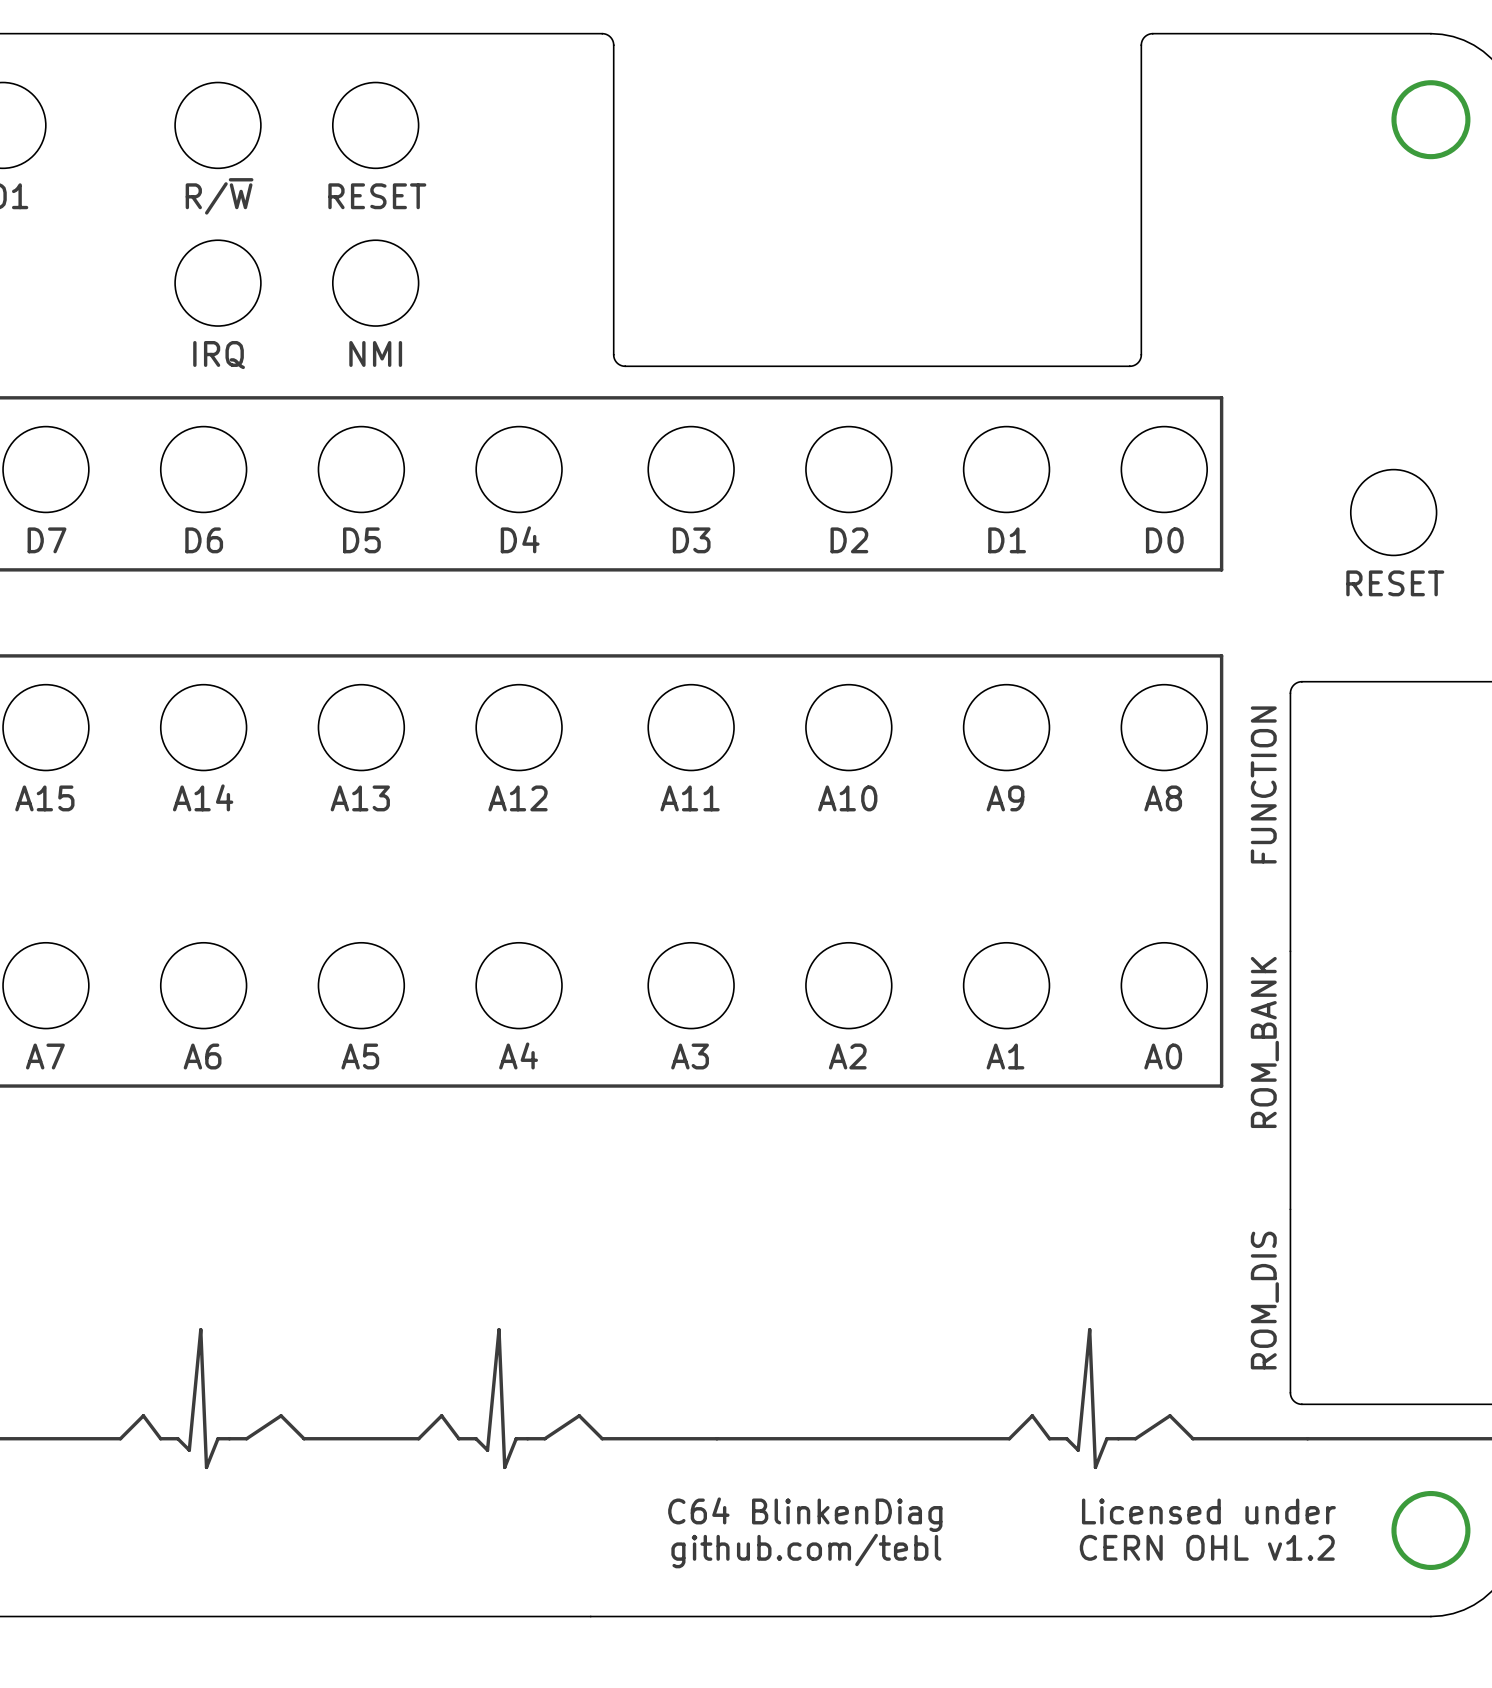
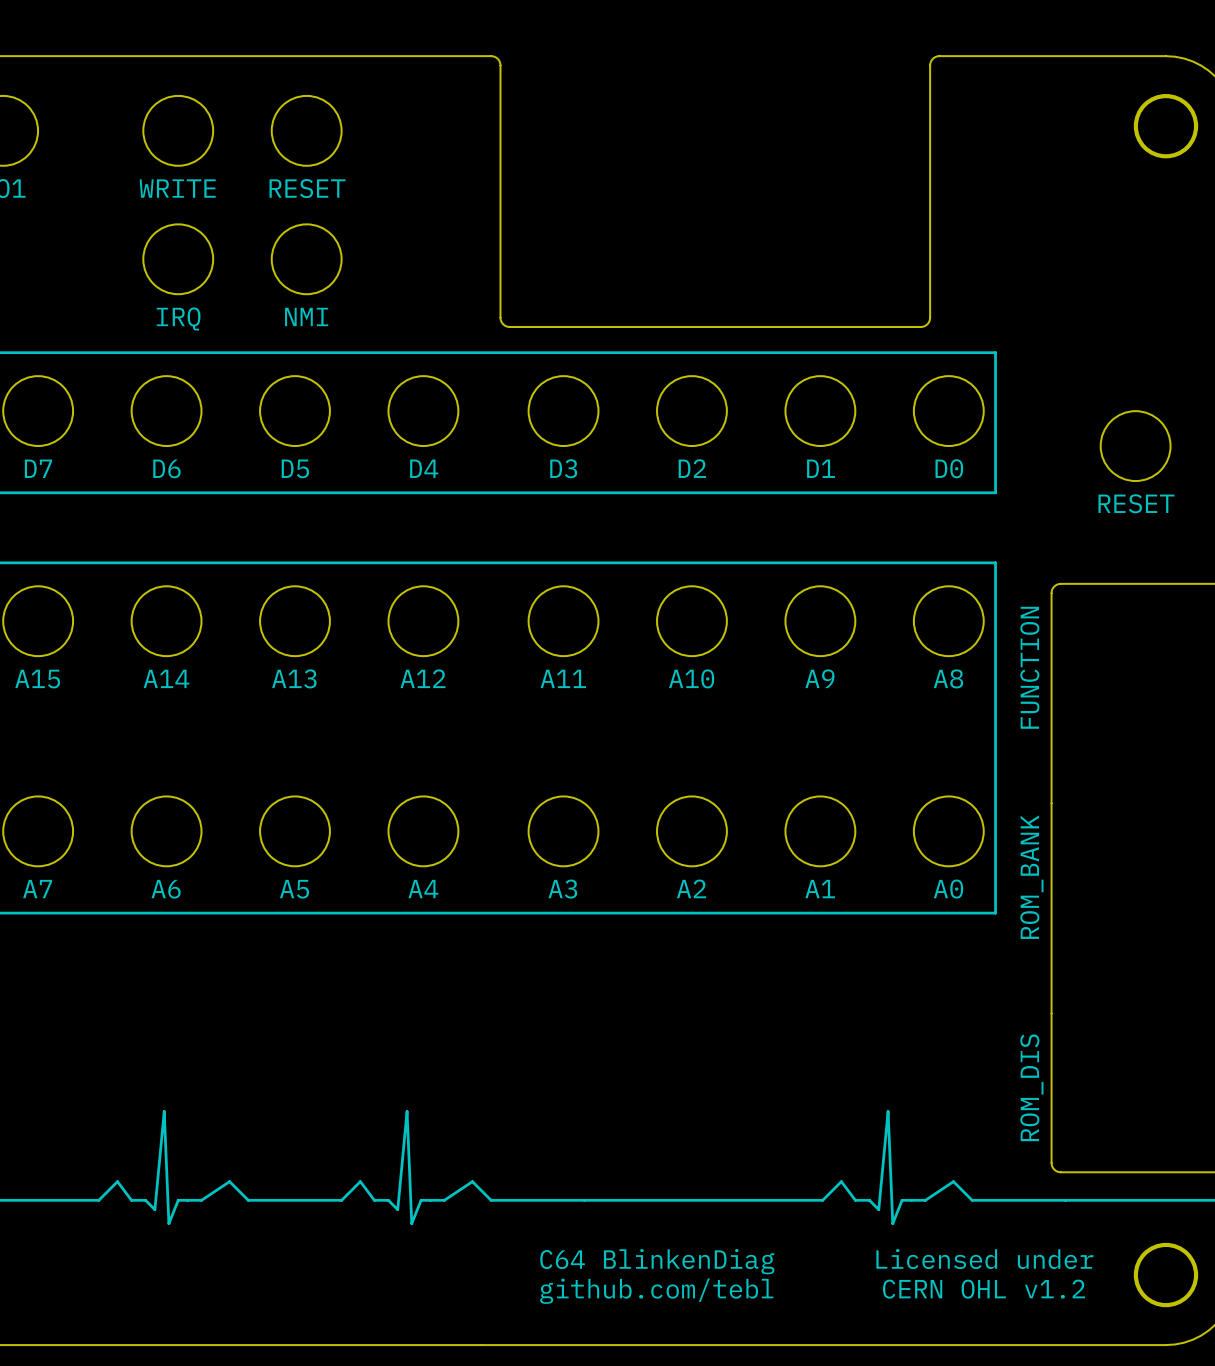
text: R/~{W} (219, 196) -> WRITE (177, 188)

